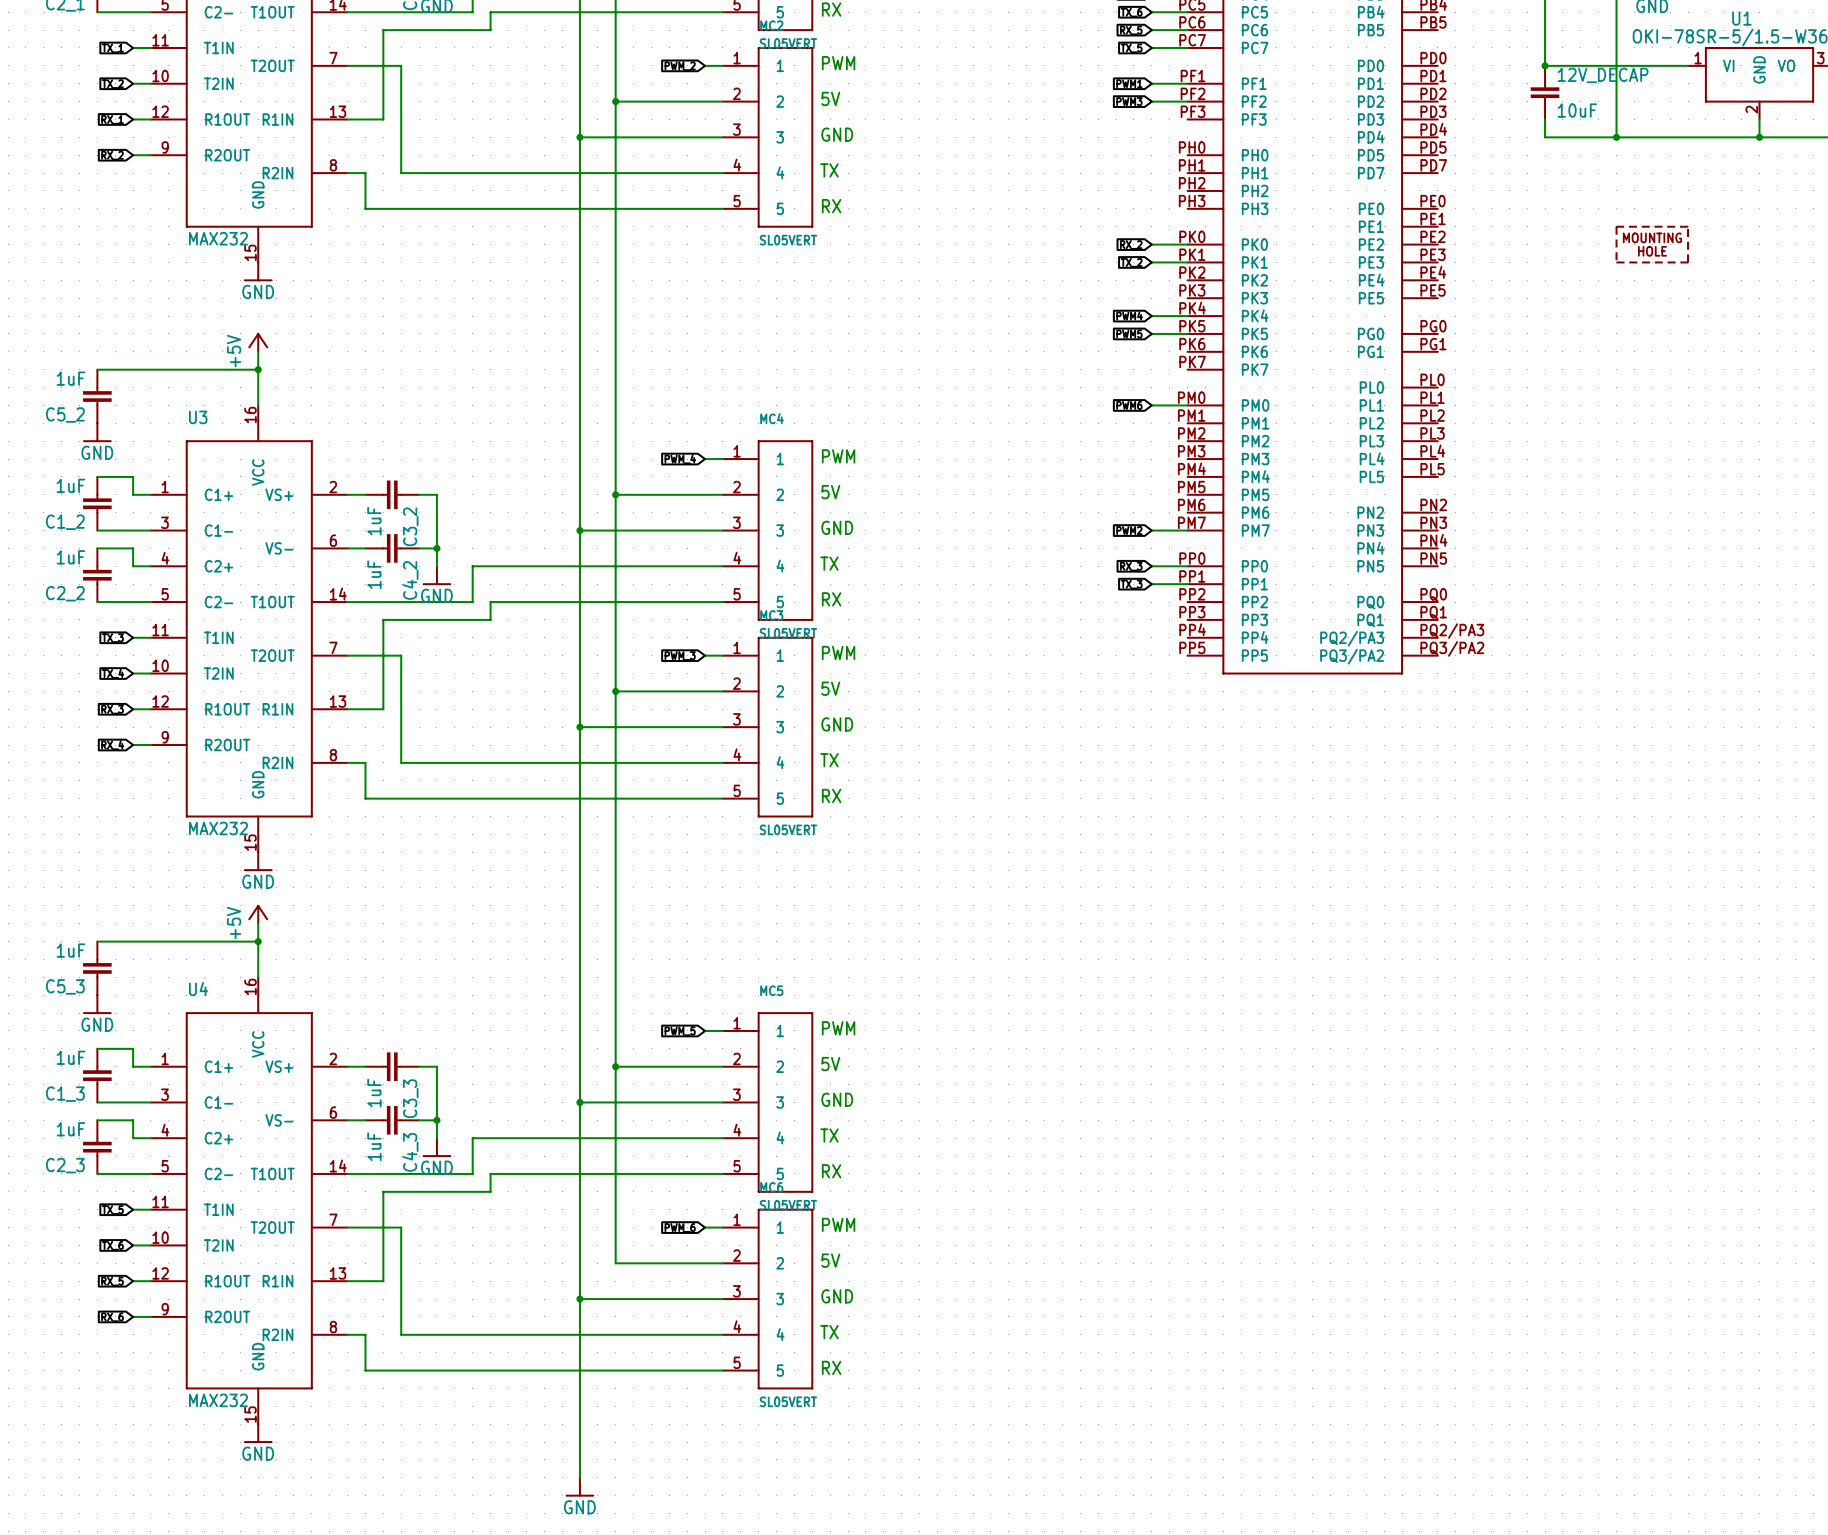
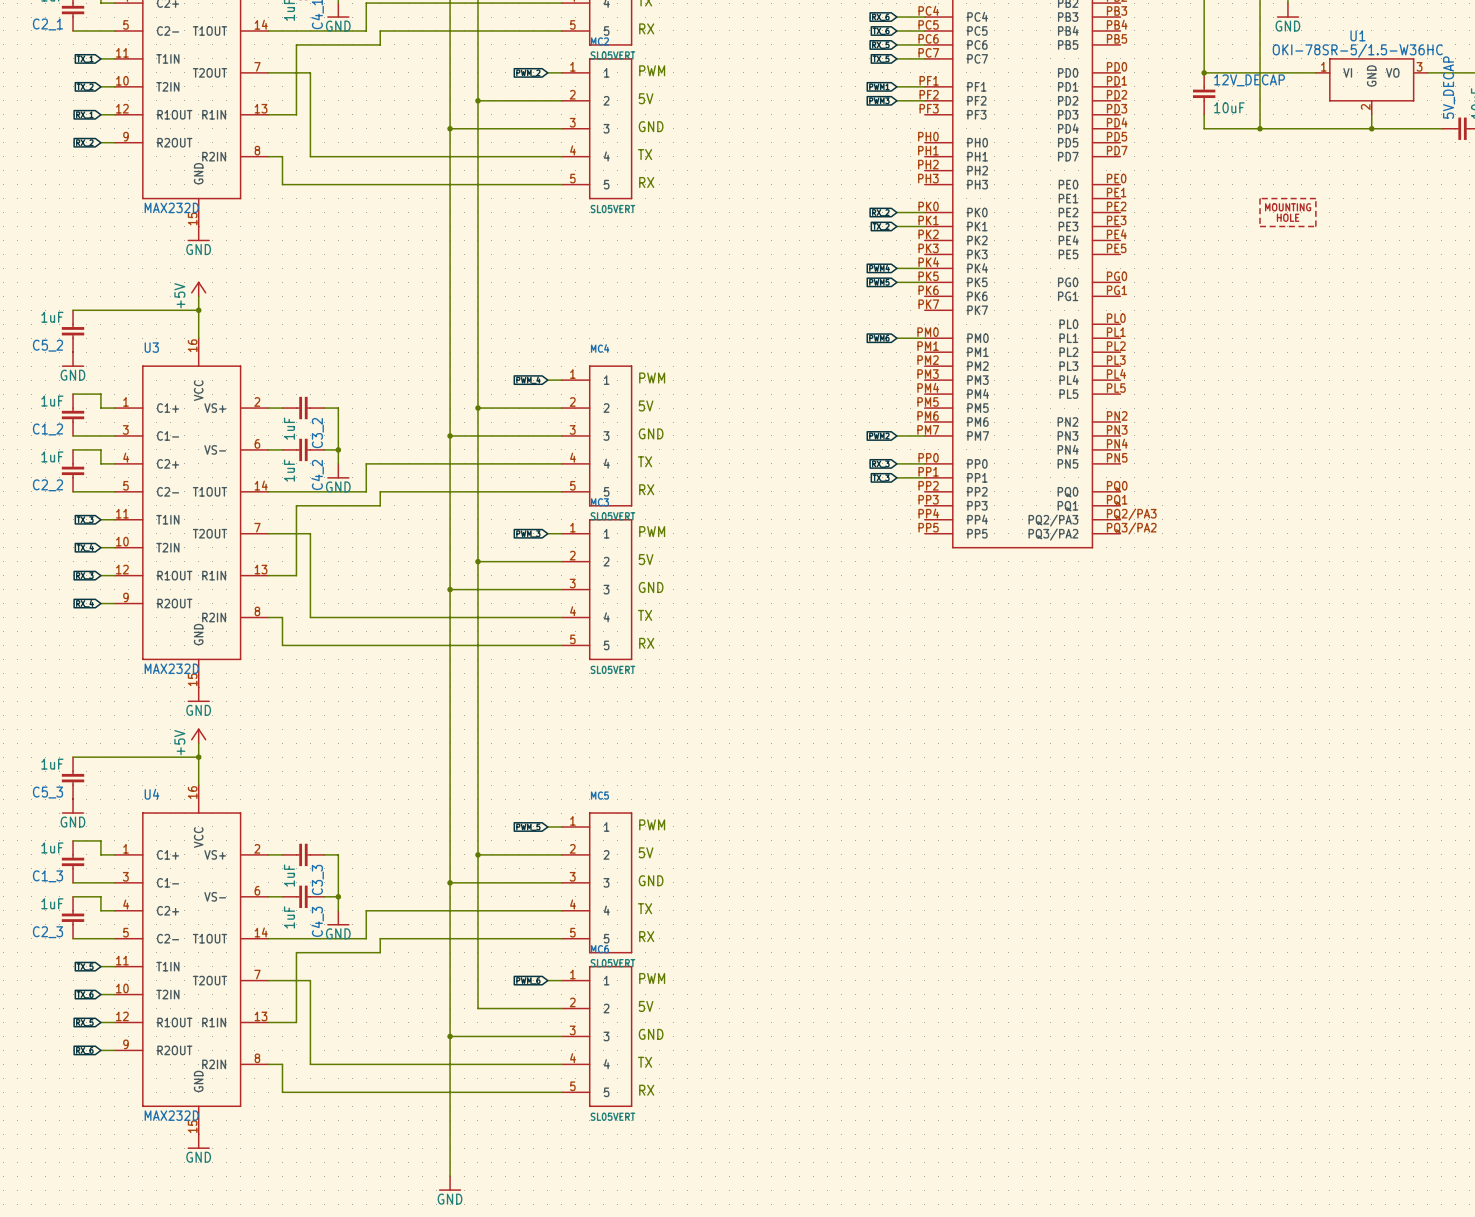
part value: MAX232 (218, 238) -> MAX232D (171, 207)
U3 value: MAX232 (218, 828) -> MAX232D (171, 668)
U4 value: MAX232 (218, 1400) -> MAX232D (171, 1115)

